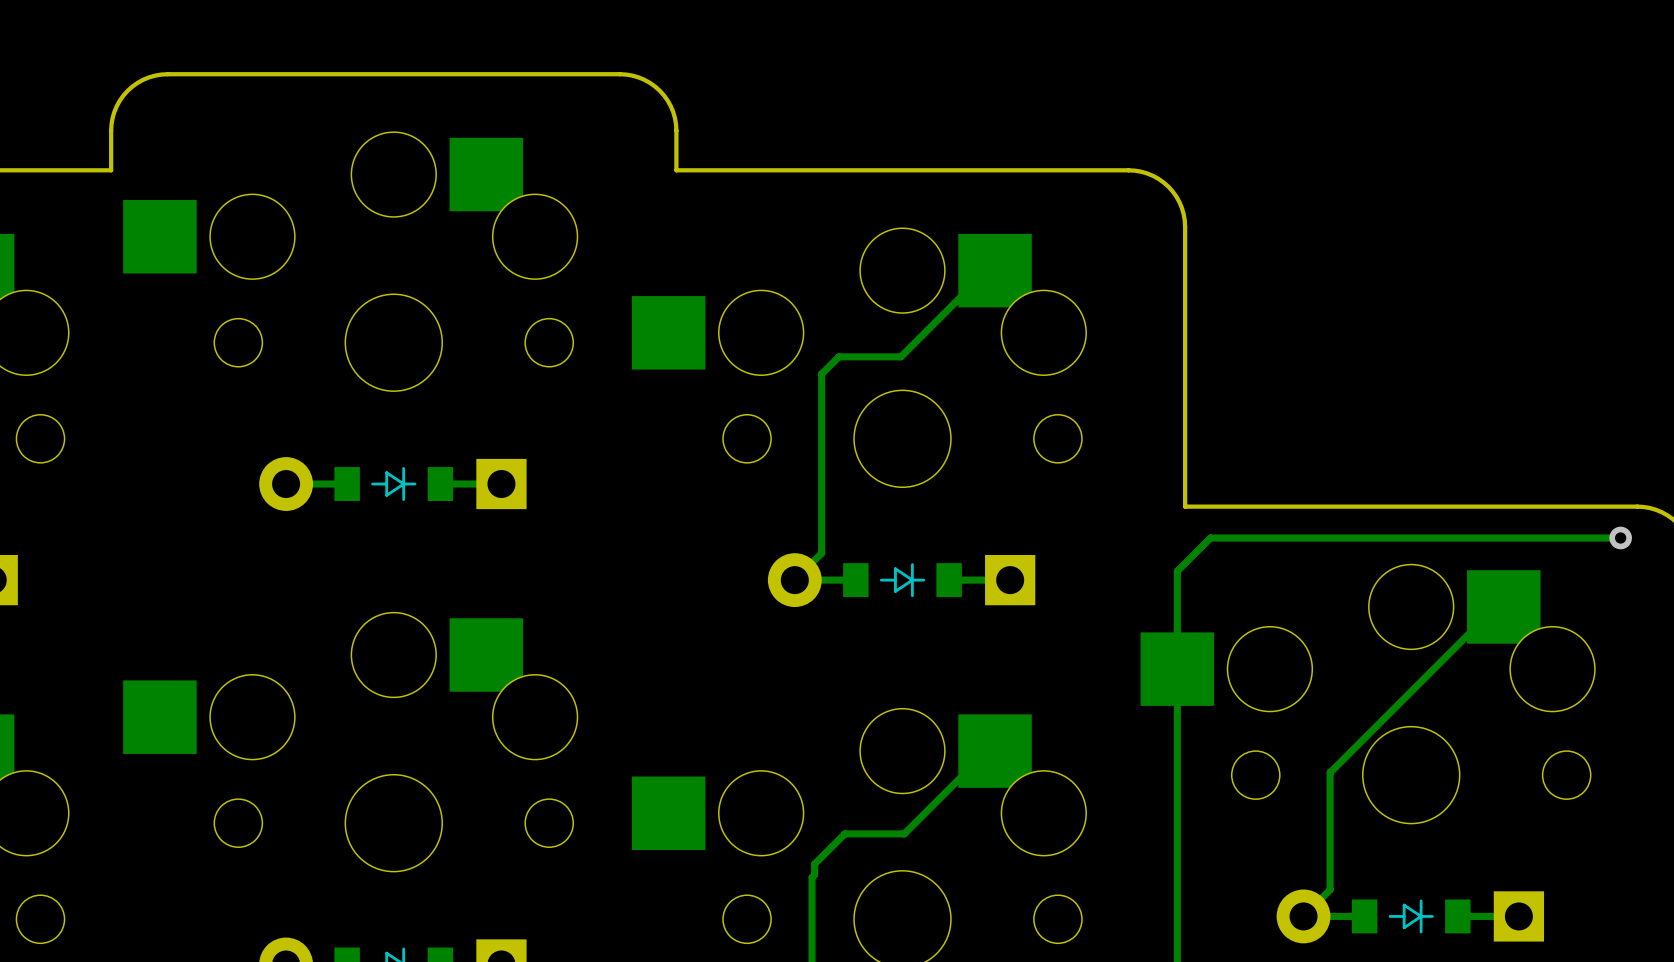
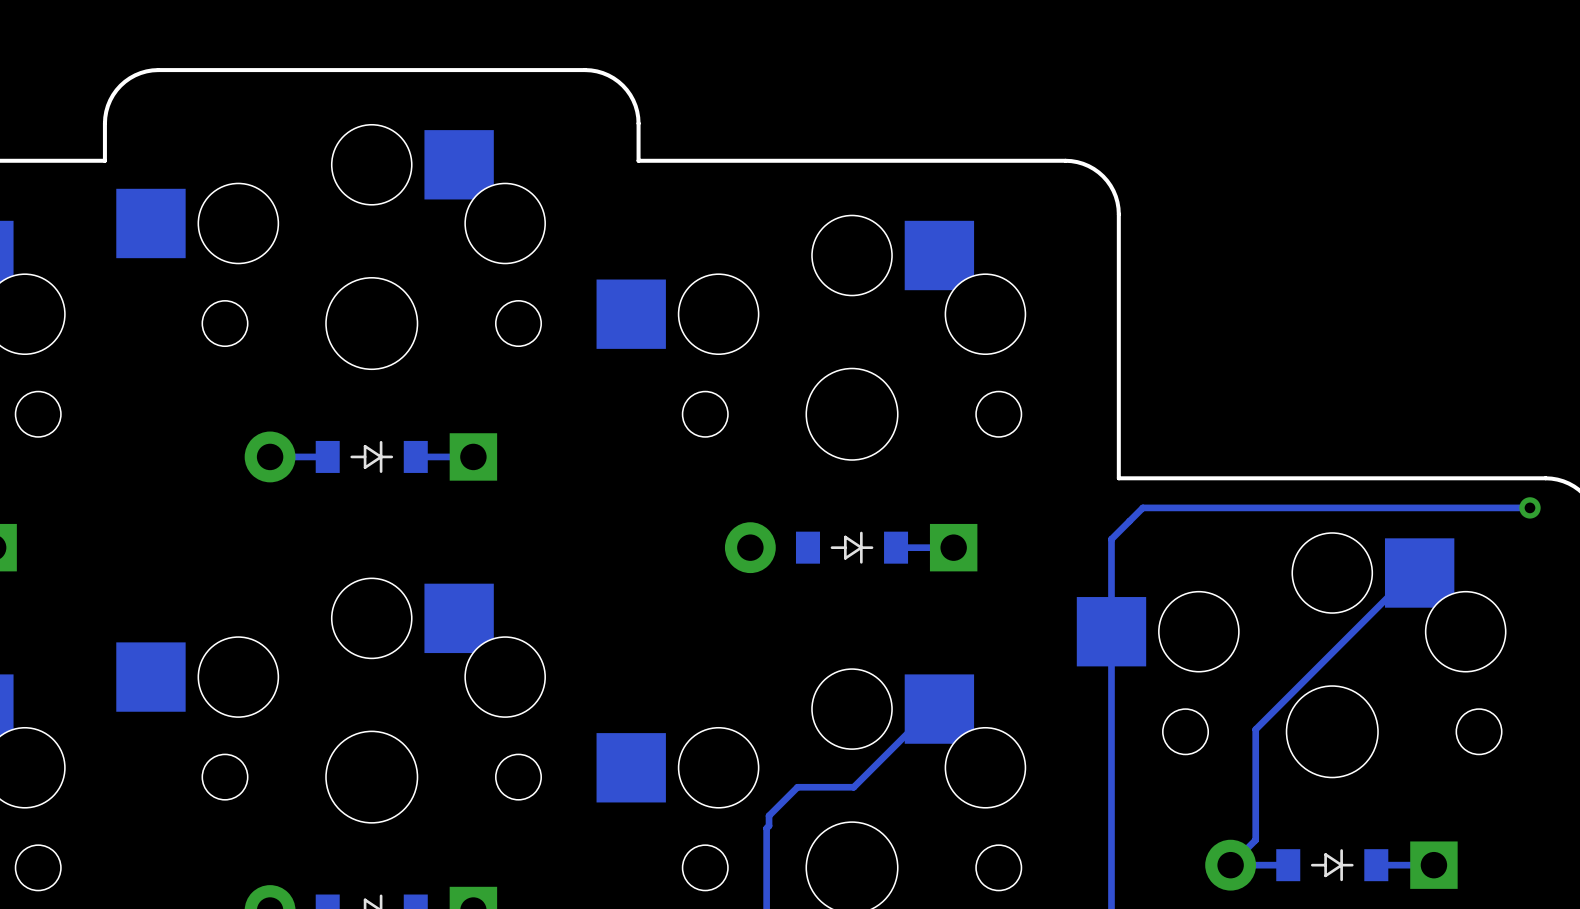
track: (995, 270) (987, 270) (900, 356) (838, 356) (821, 374) (821, 553) (794, 580) (855, 580) -> none

